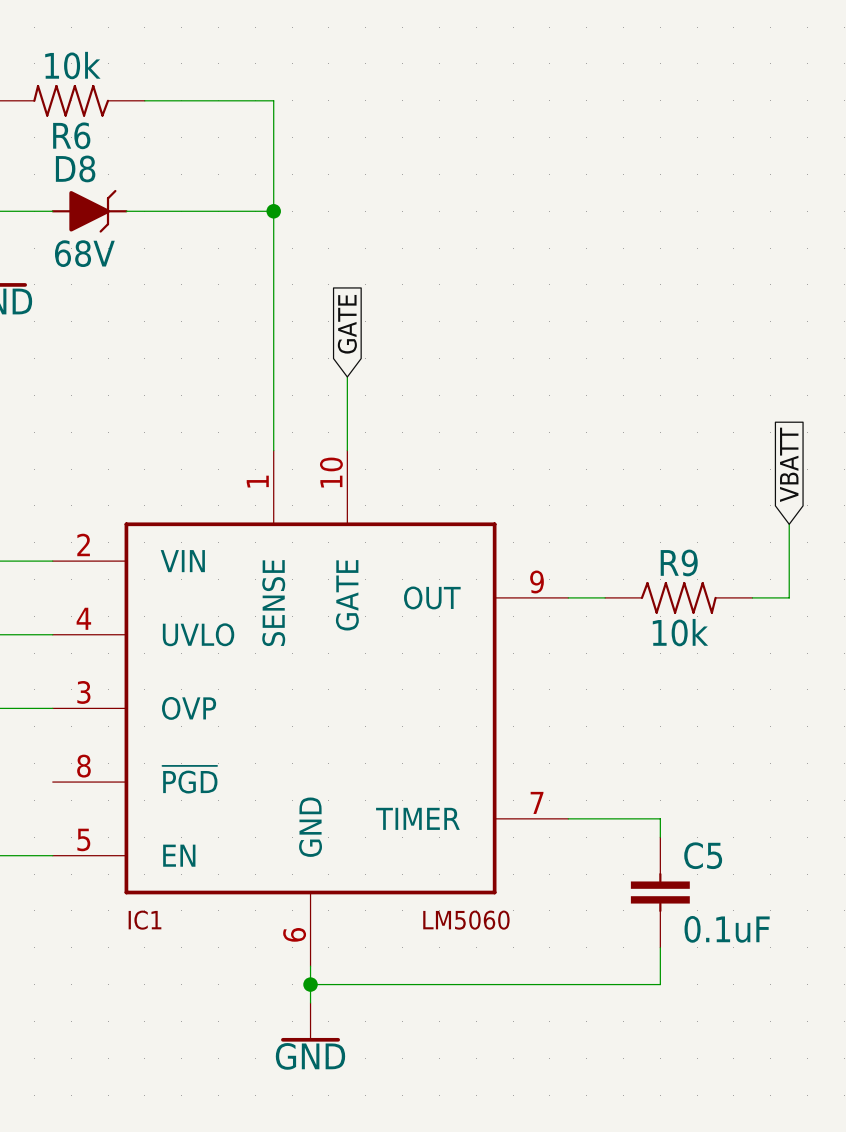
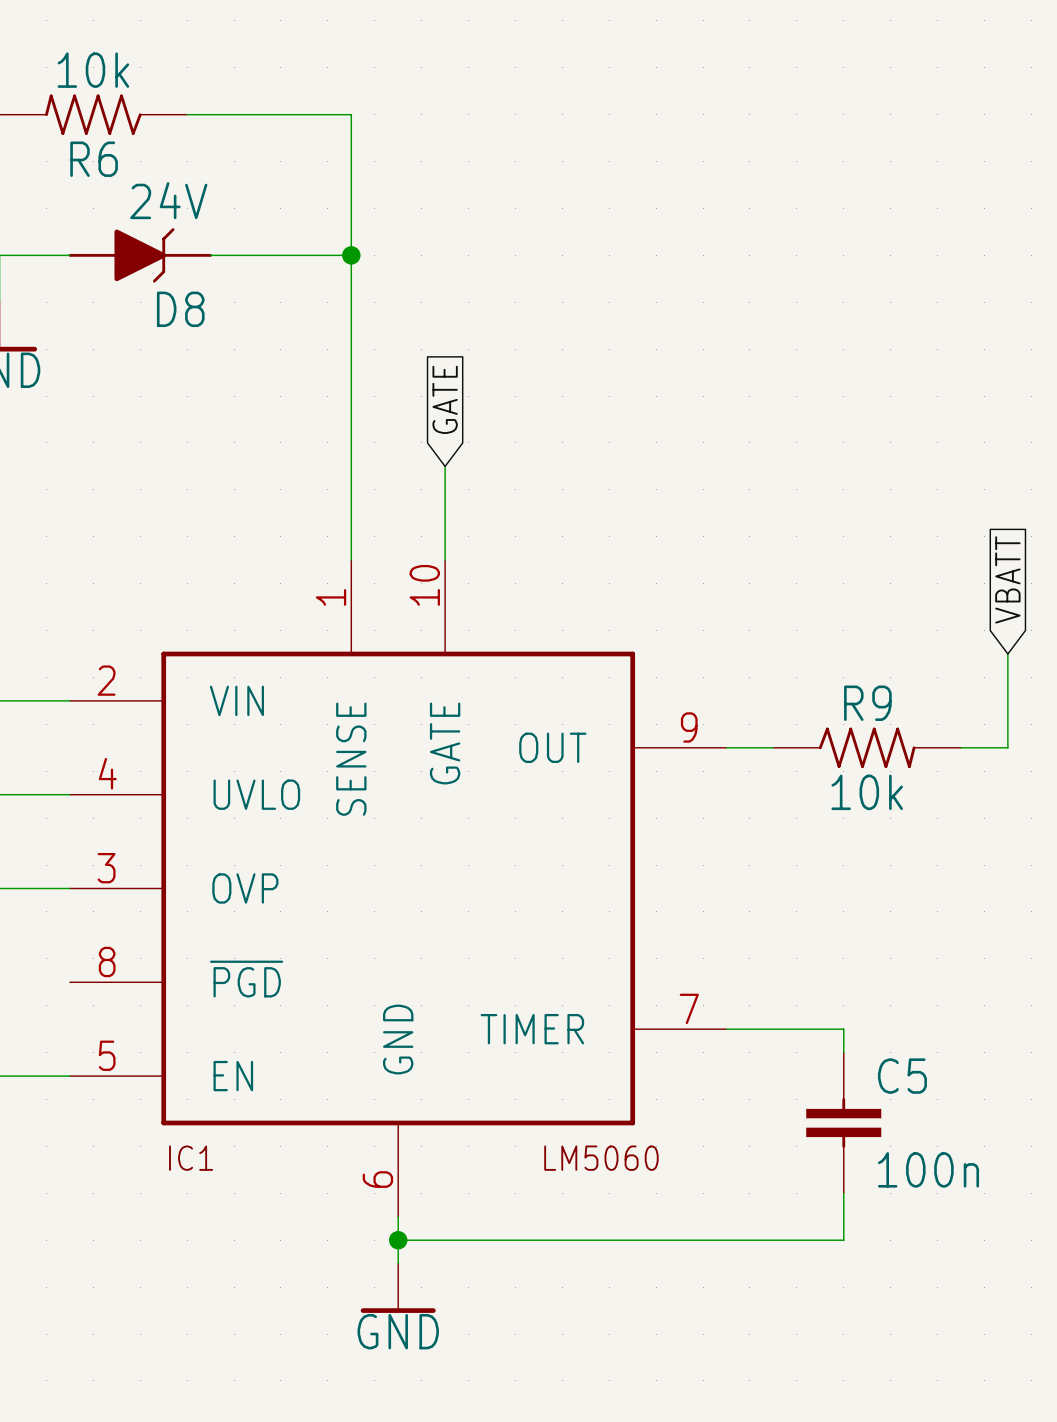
D8 name position: D8 (75, 168) -> D8 (180, 309)
D8 symbol: [51, 189, 128, 233] -> [68, 228, 213, 283]
D8 value: 68V (84, 253) -> 24V (168, 200)
C5 value: 0.1uF (727, 929) -> 100n (928, 1169)

